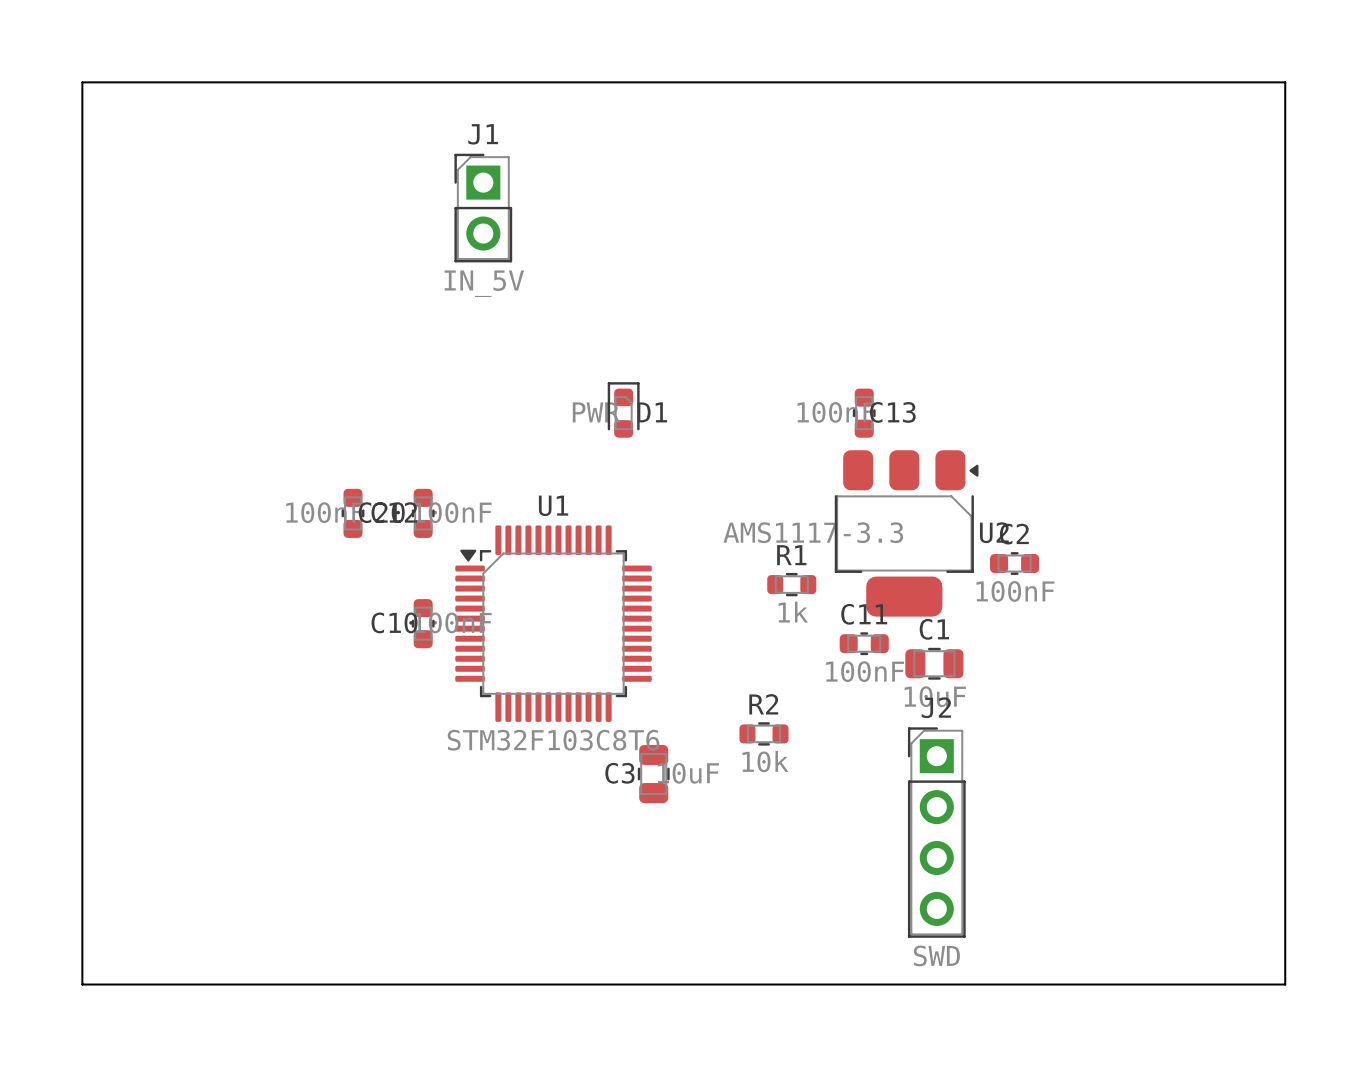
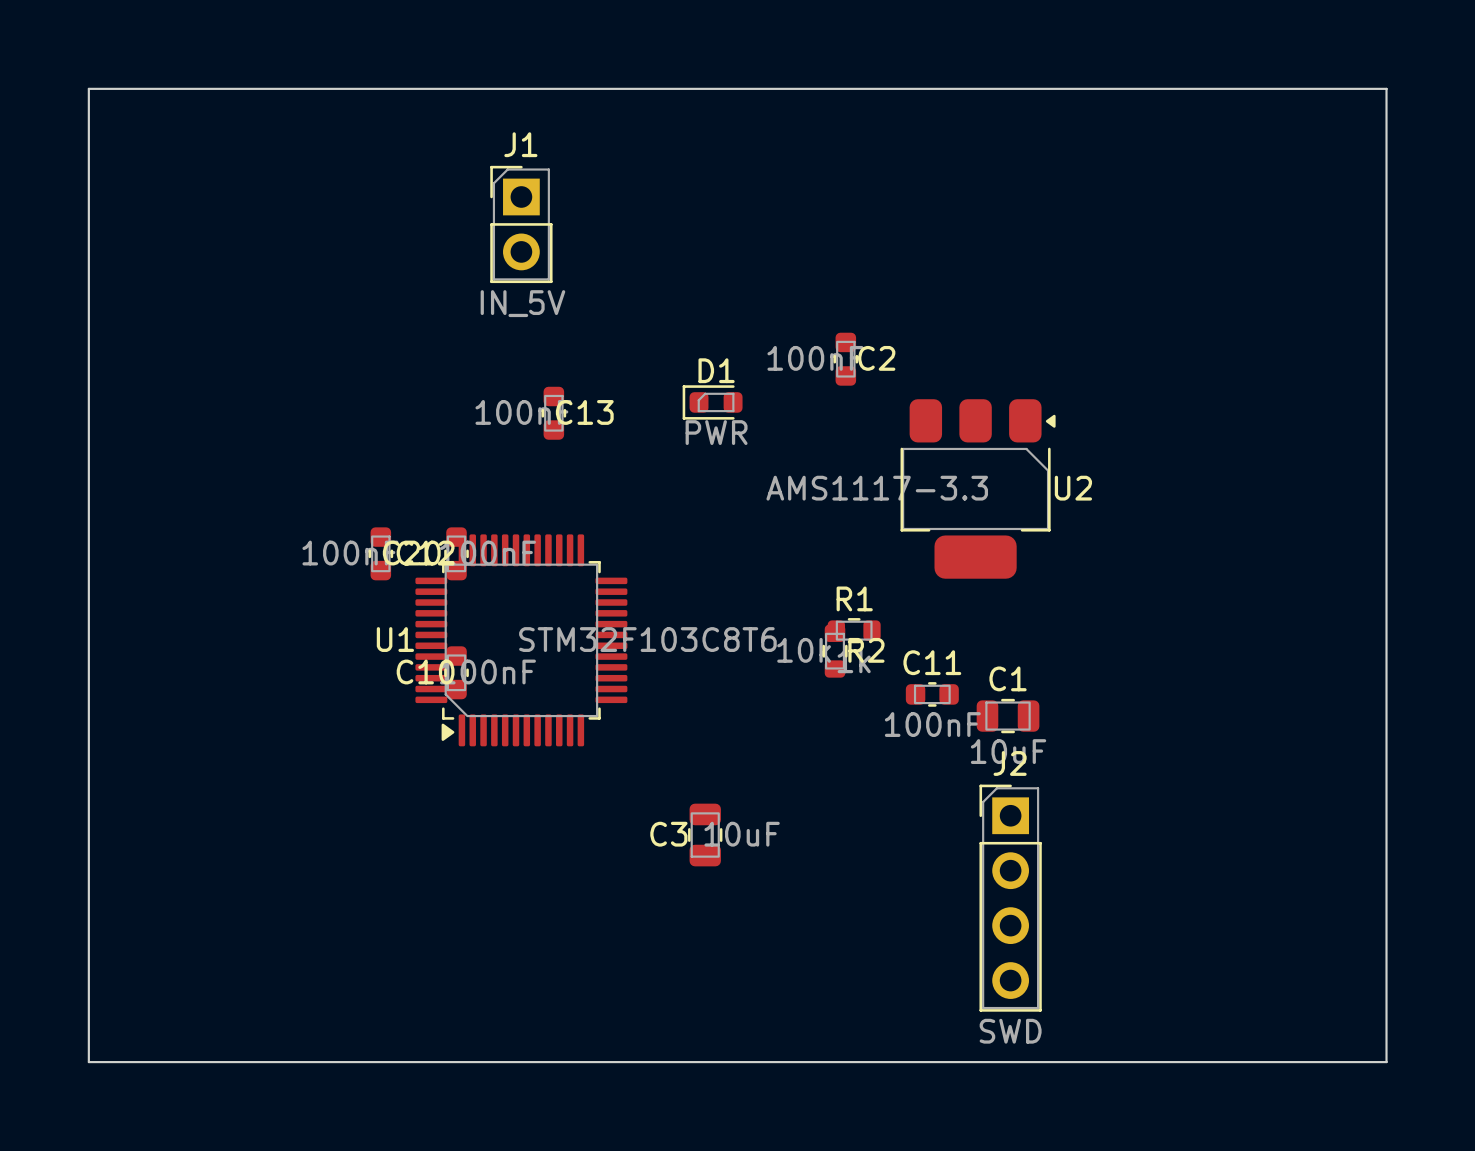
D1 rotation: 0° (623, 409) -> 90° counterclockwise (712, 402)
D1 position: (623, 409) -> (712, 402)
C13 position: (864, 413) -> (553, 413)
U2 position: (906, 533) -> (978, 488)
C2 rotation: 0° (1014, 563) -> 90° clockwise (845, 359)
C2 position: (1014, 563) -> (845, 359)
U1 rotation: 0° (553, 623) -> 90° counterclockwise (521, 640)
R2 rotation: 0° (763, 733) -> 90° clockwise (835, 651)
R2 position: (763, 733) -> (835, 651)

